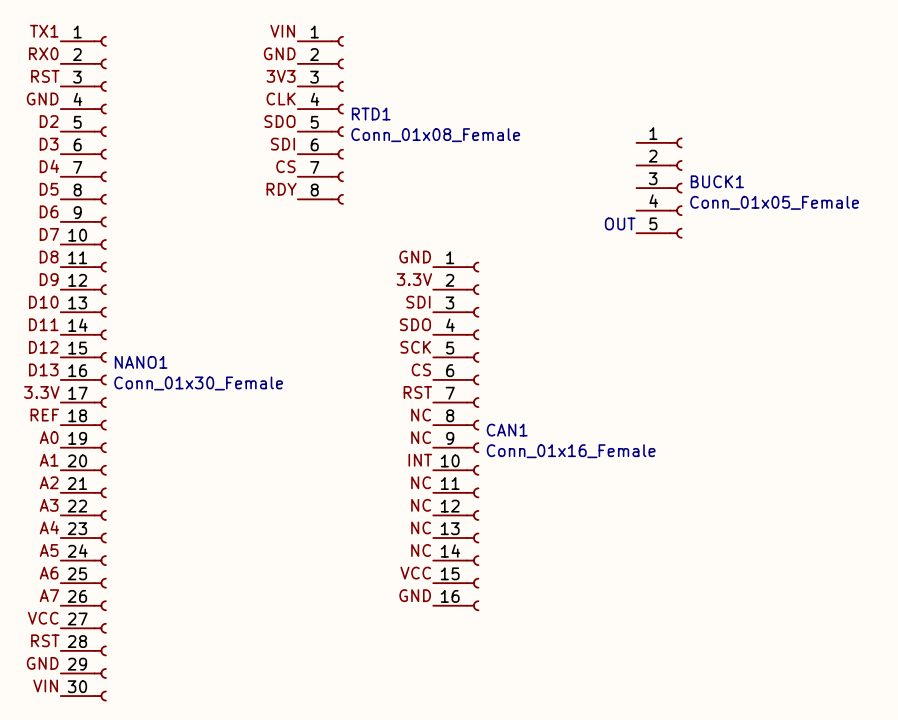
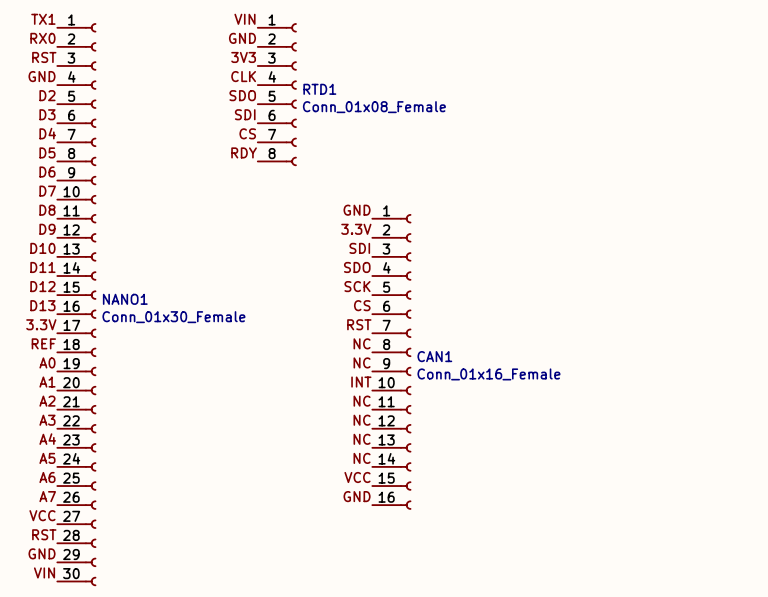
BUCK1: Conn_01x05_Female (659, 188) -> none
text: OUT (620, 223) -> none

